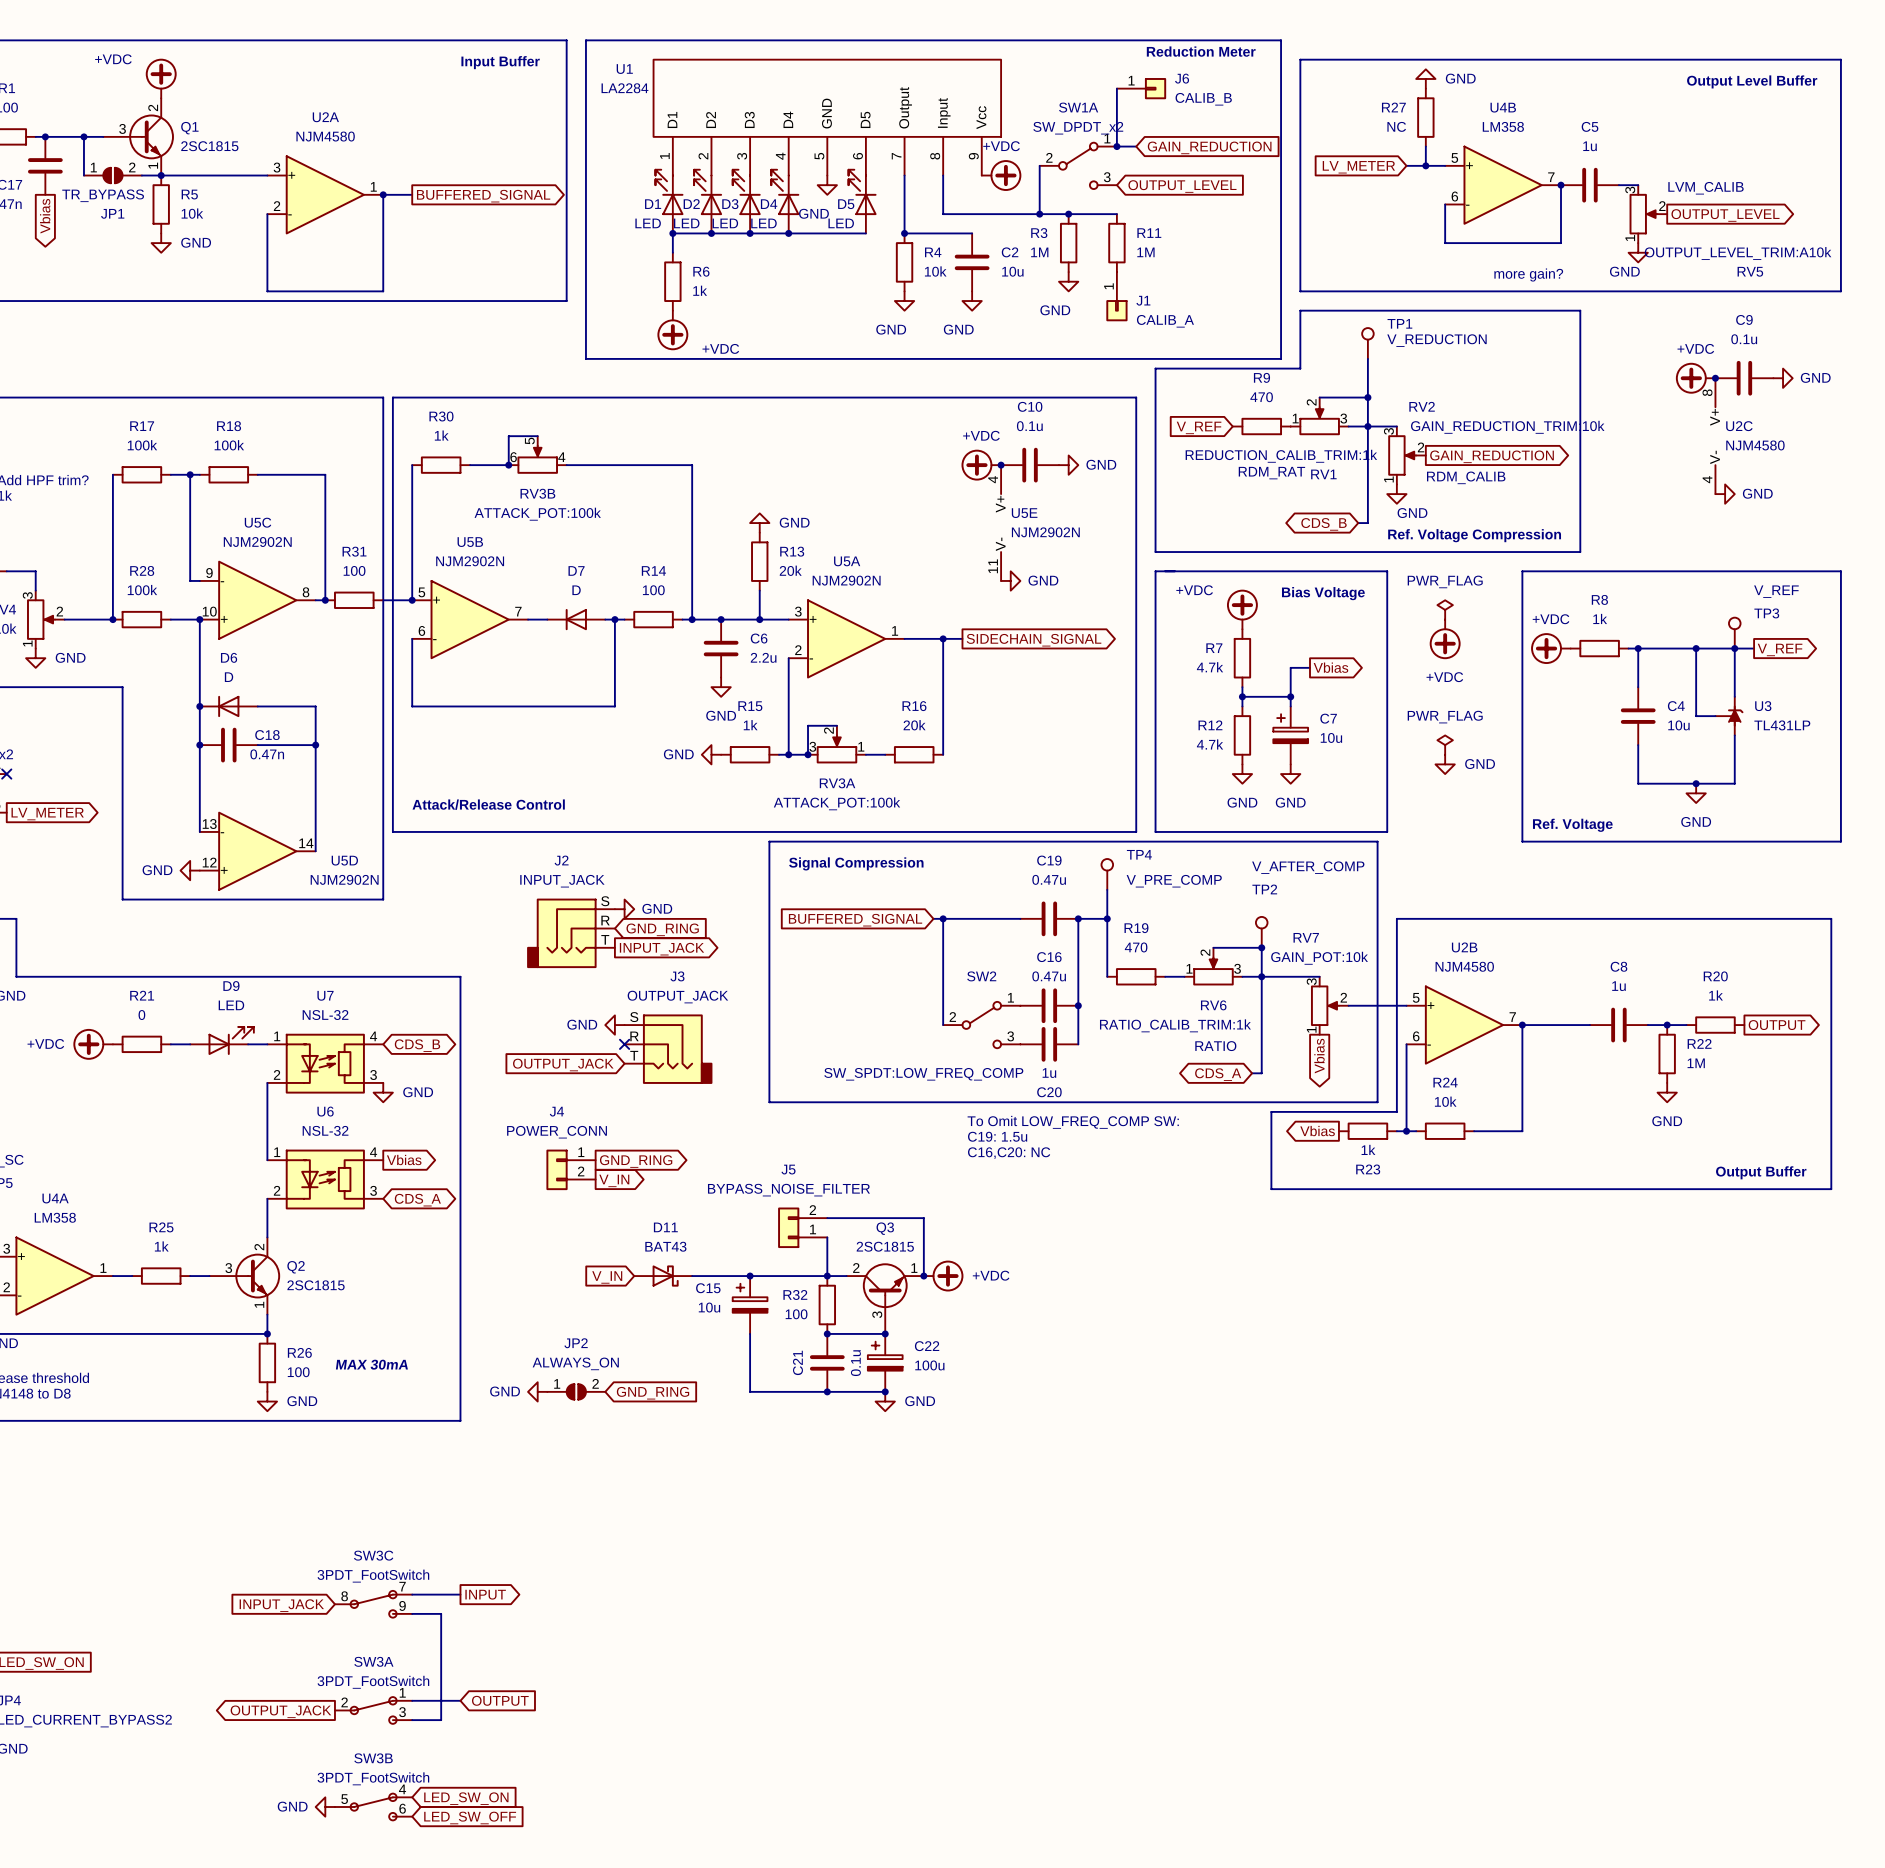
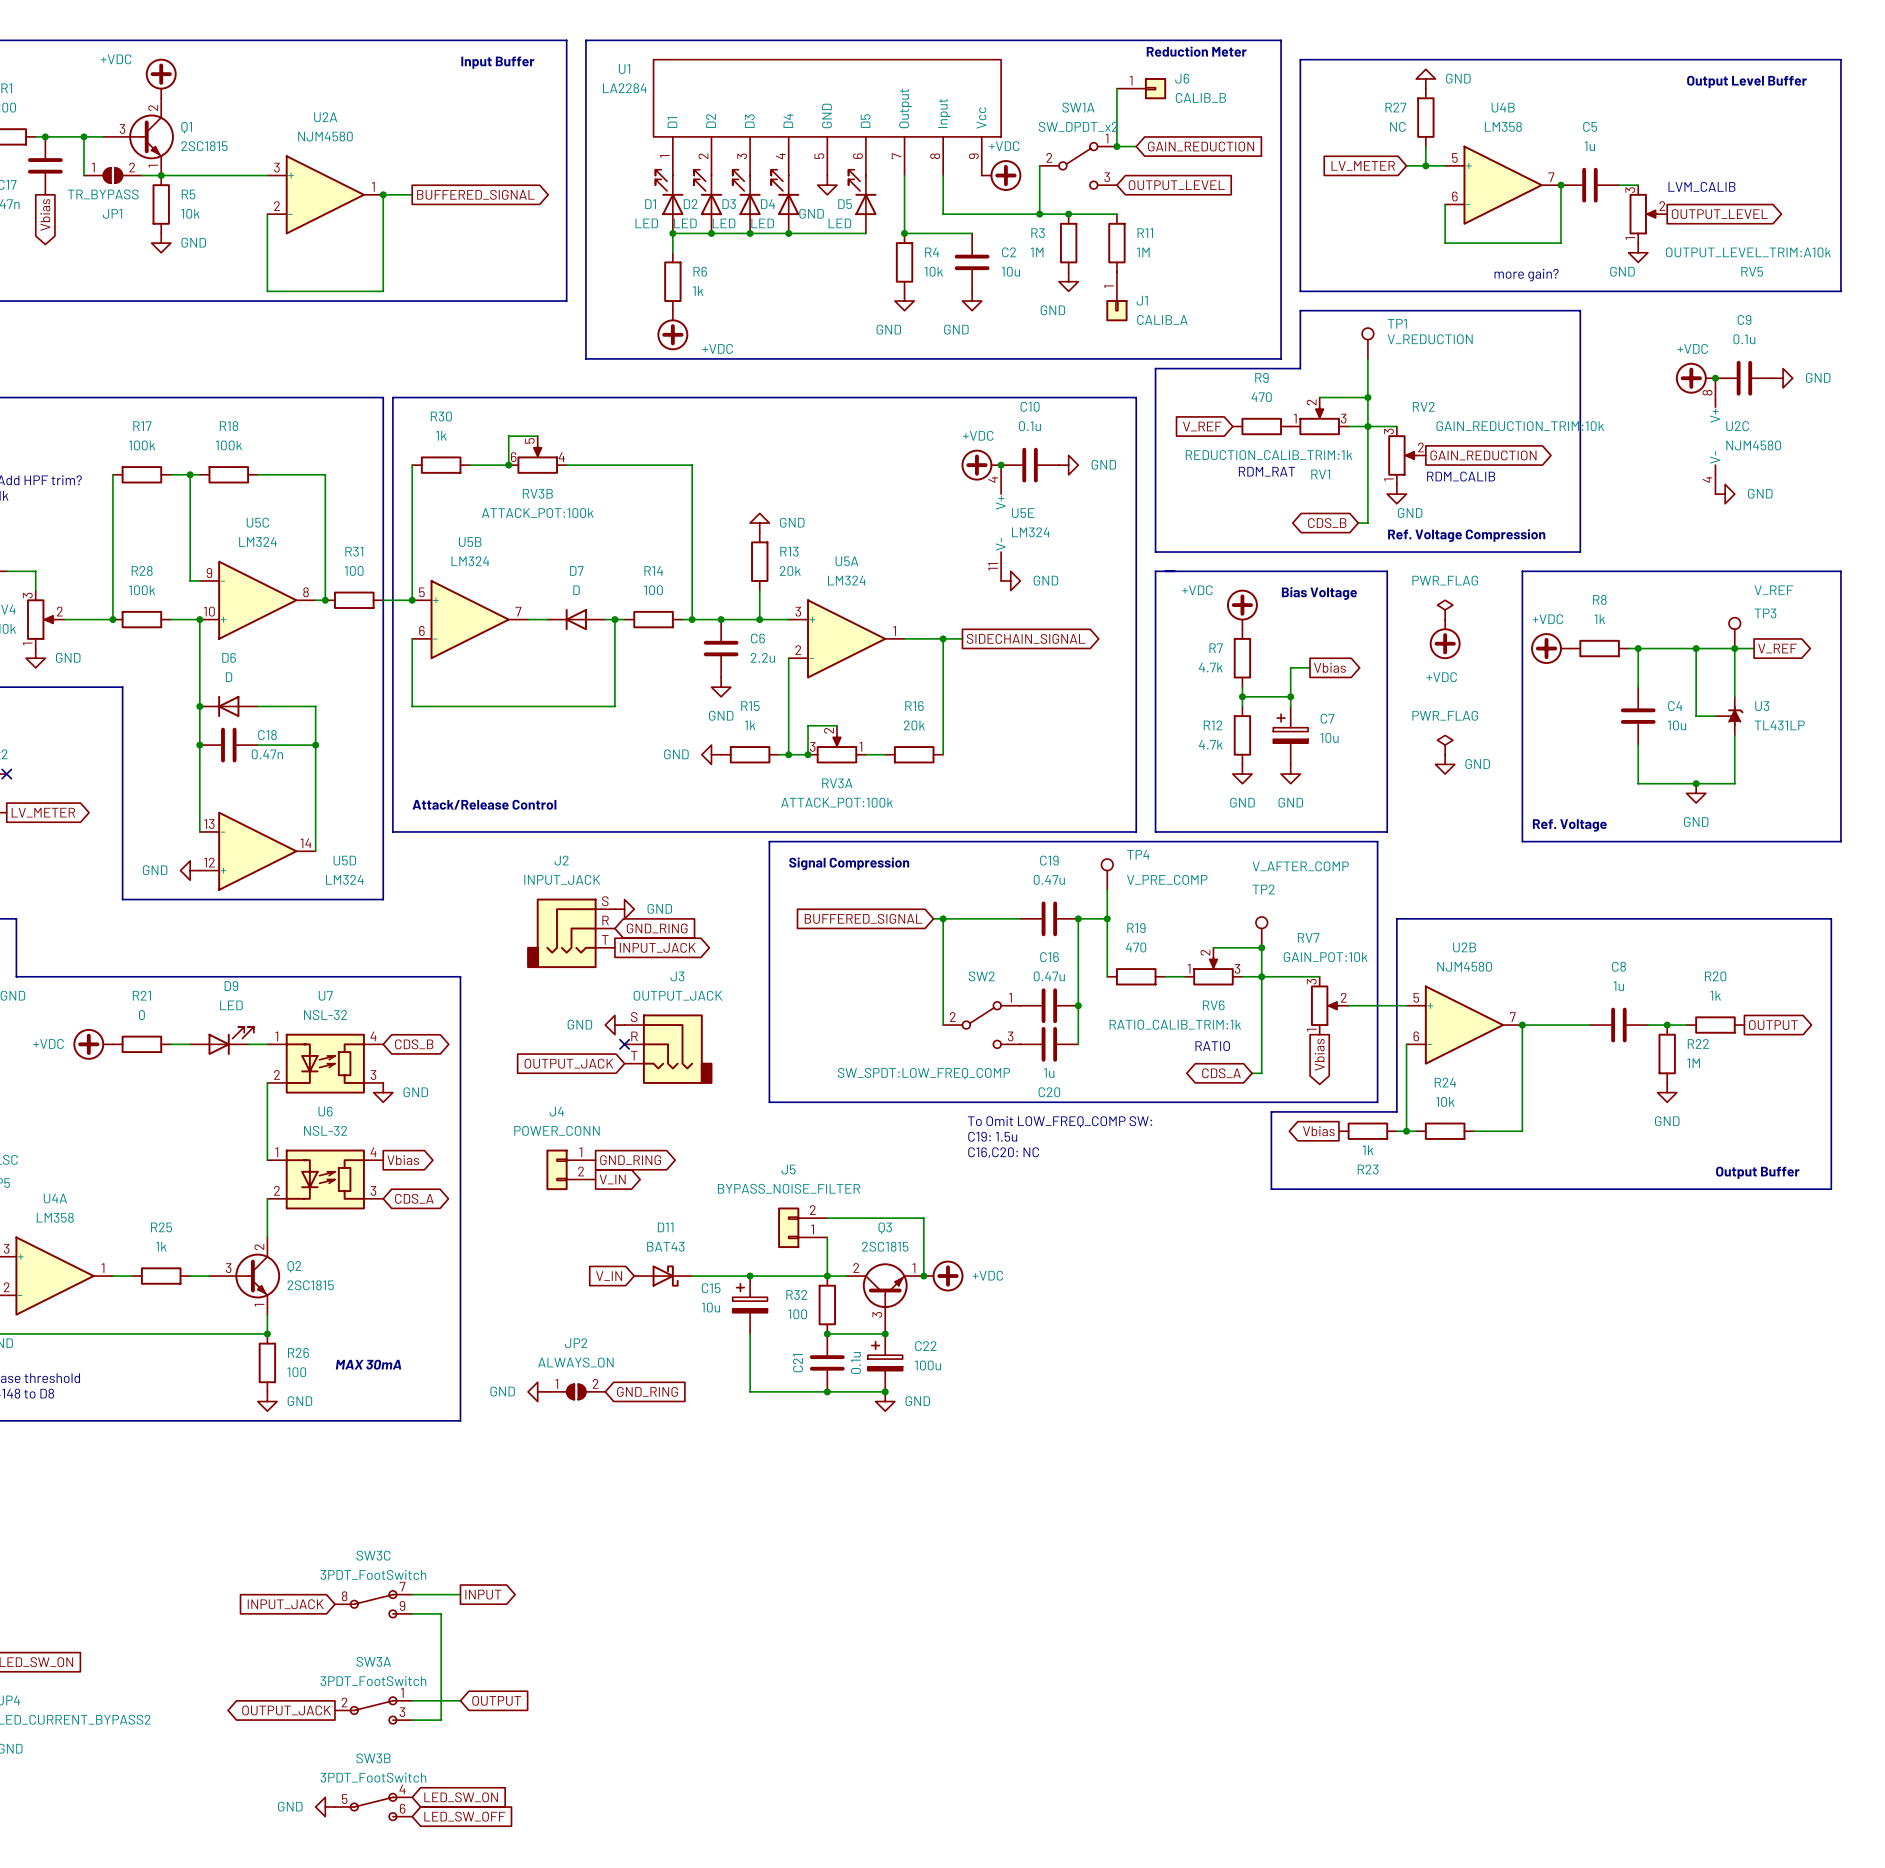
U5E value: NJM2902N (1045, 532) -> LM324 (1030, 532)
U5C value: NJM2902N (257, 541) -> LM324 (257, 542)
U5B value: NJM2902N (470, 561) -> LM324 (470, 561)
U5A value: NJM2902N (846, 580) -> LM324 (846, 580)
U5D value: NJM2902N (344, 879) -> LM324 (344, 879)

